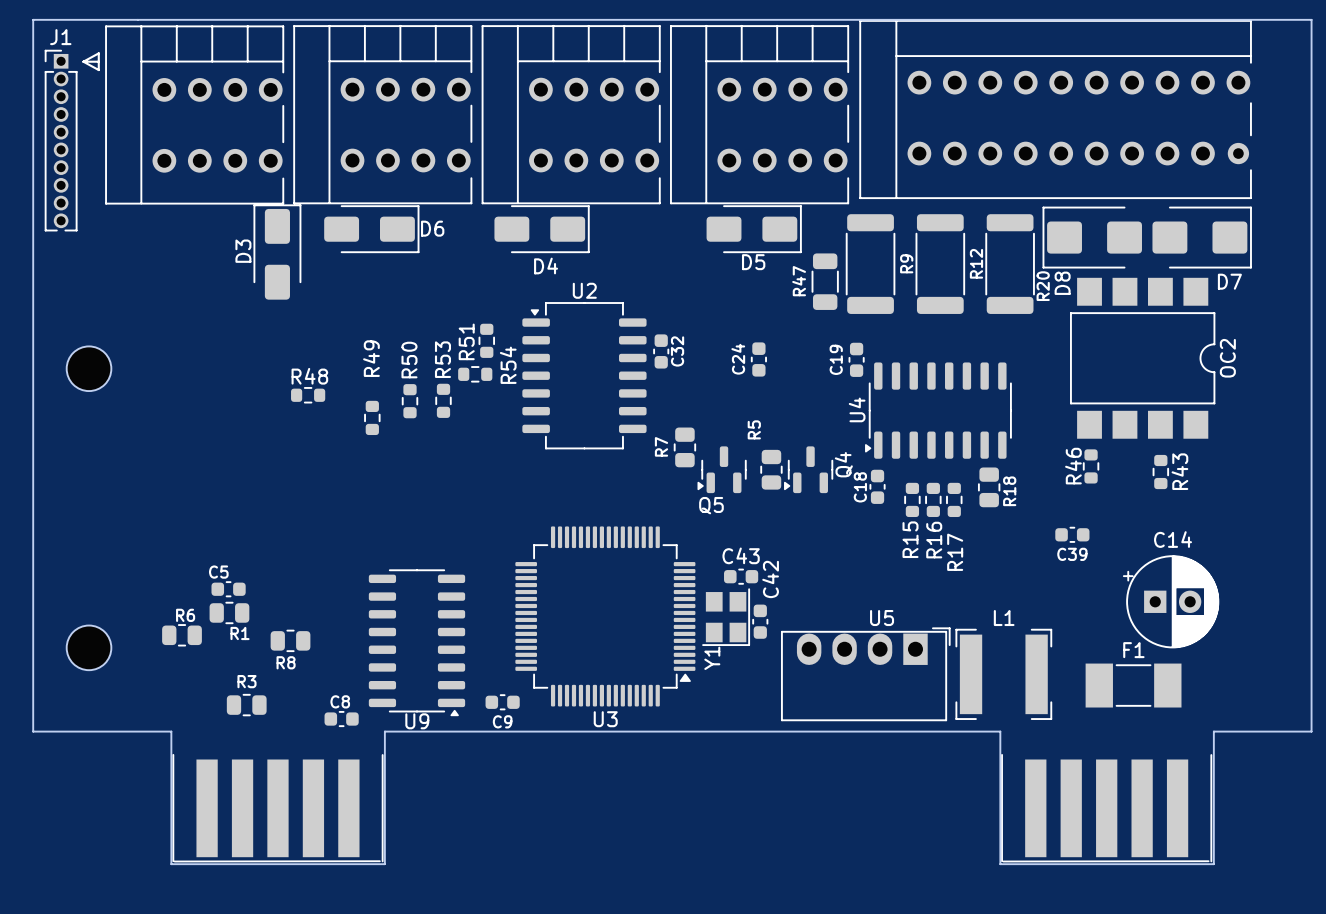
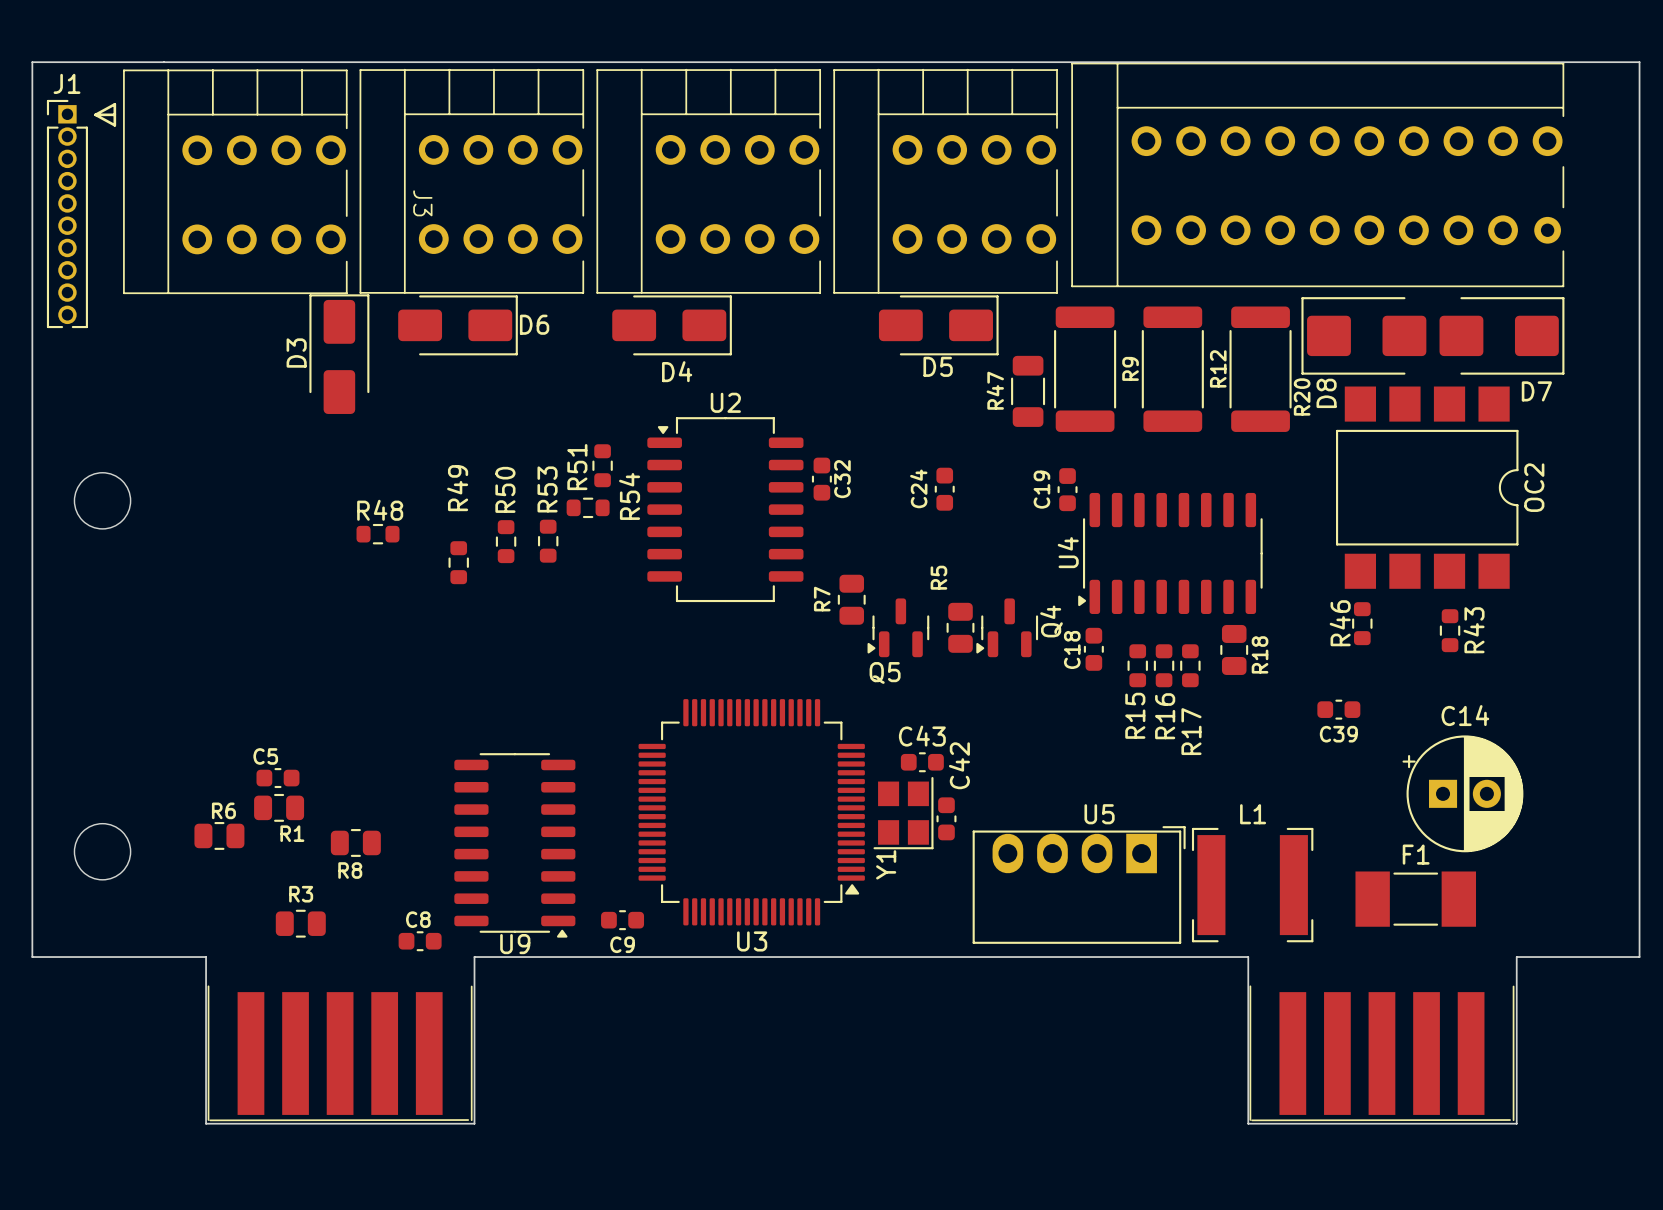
J3 name: none -> J3 (422, 203)

